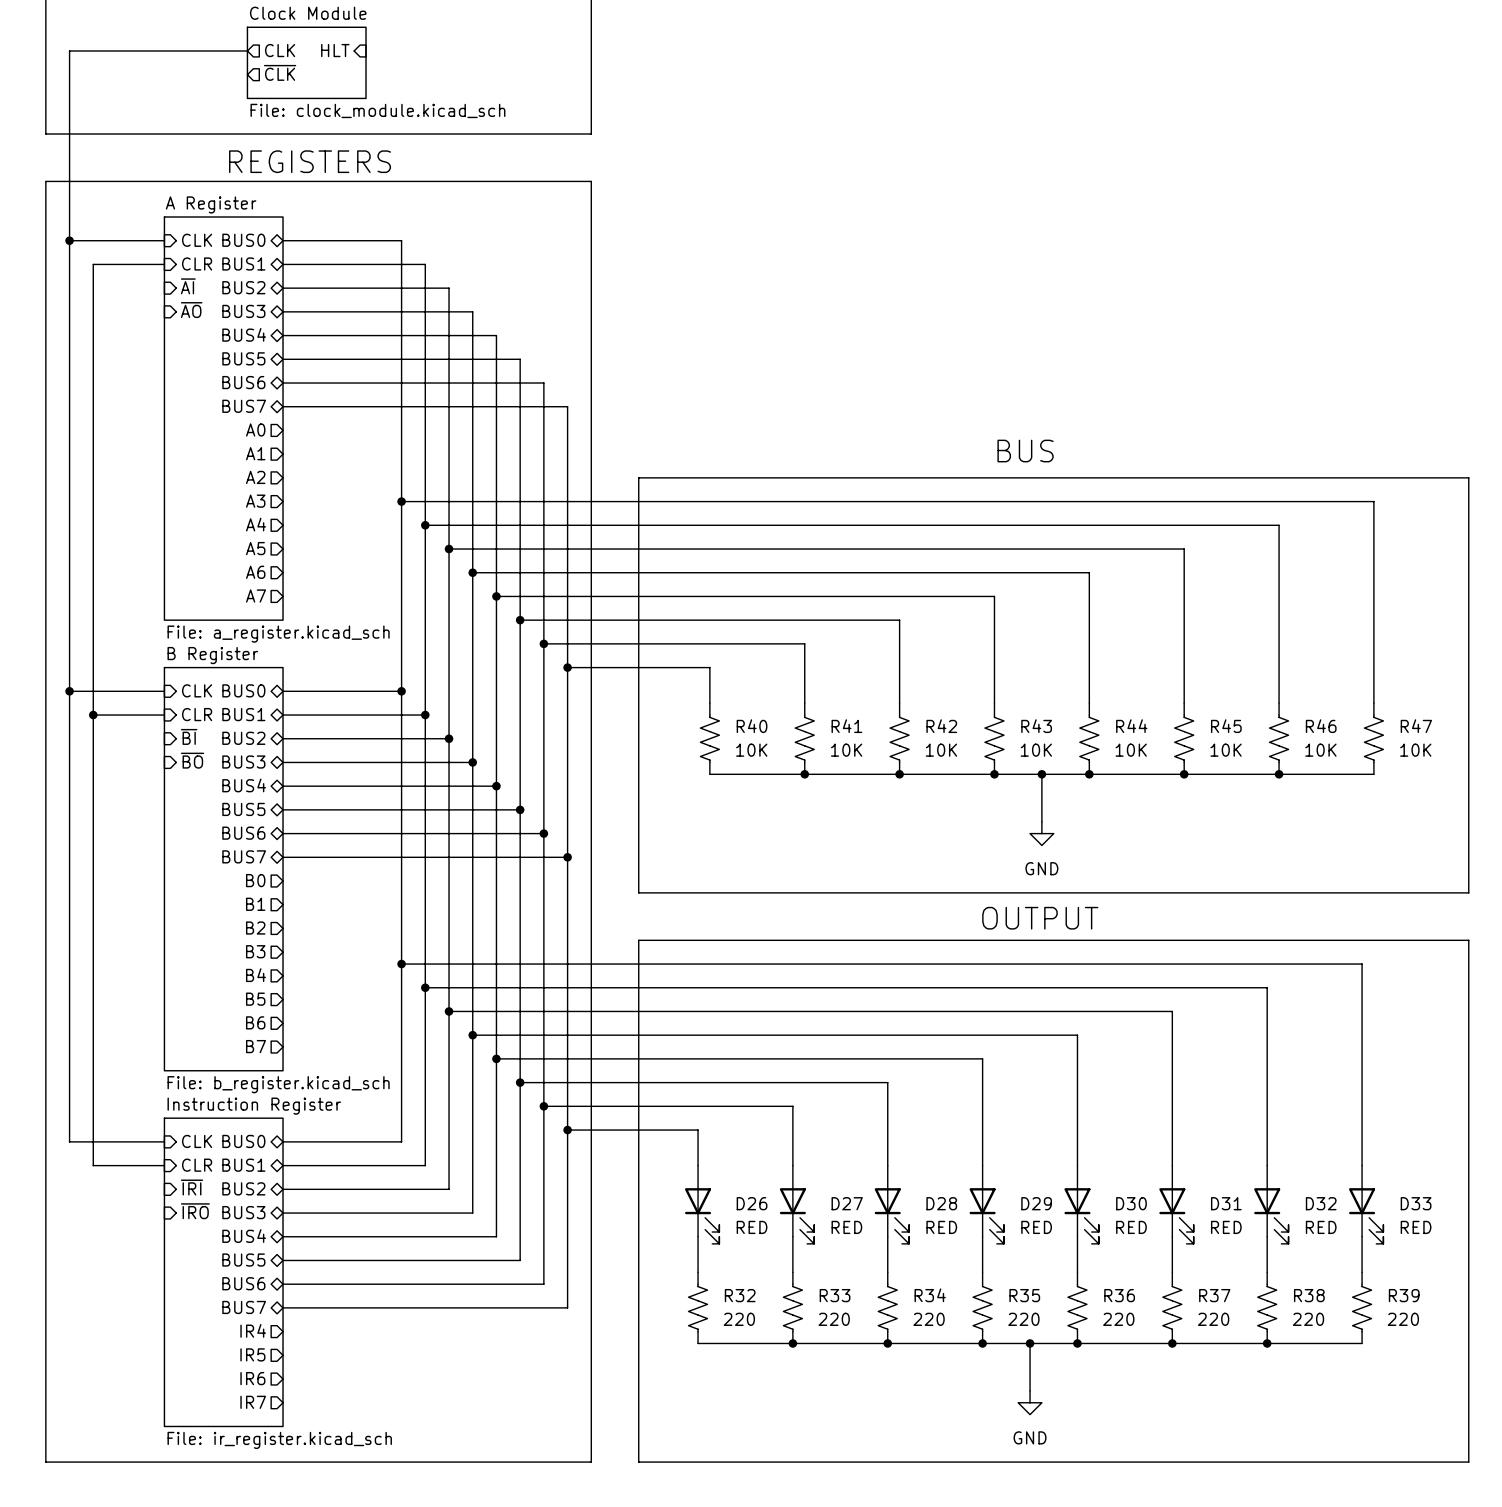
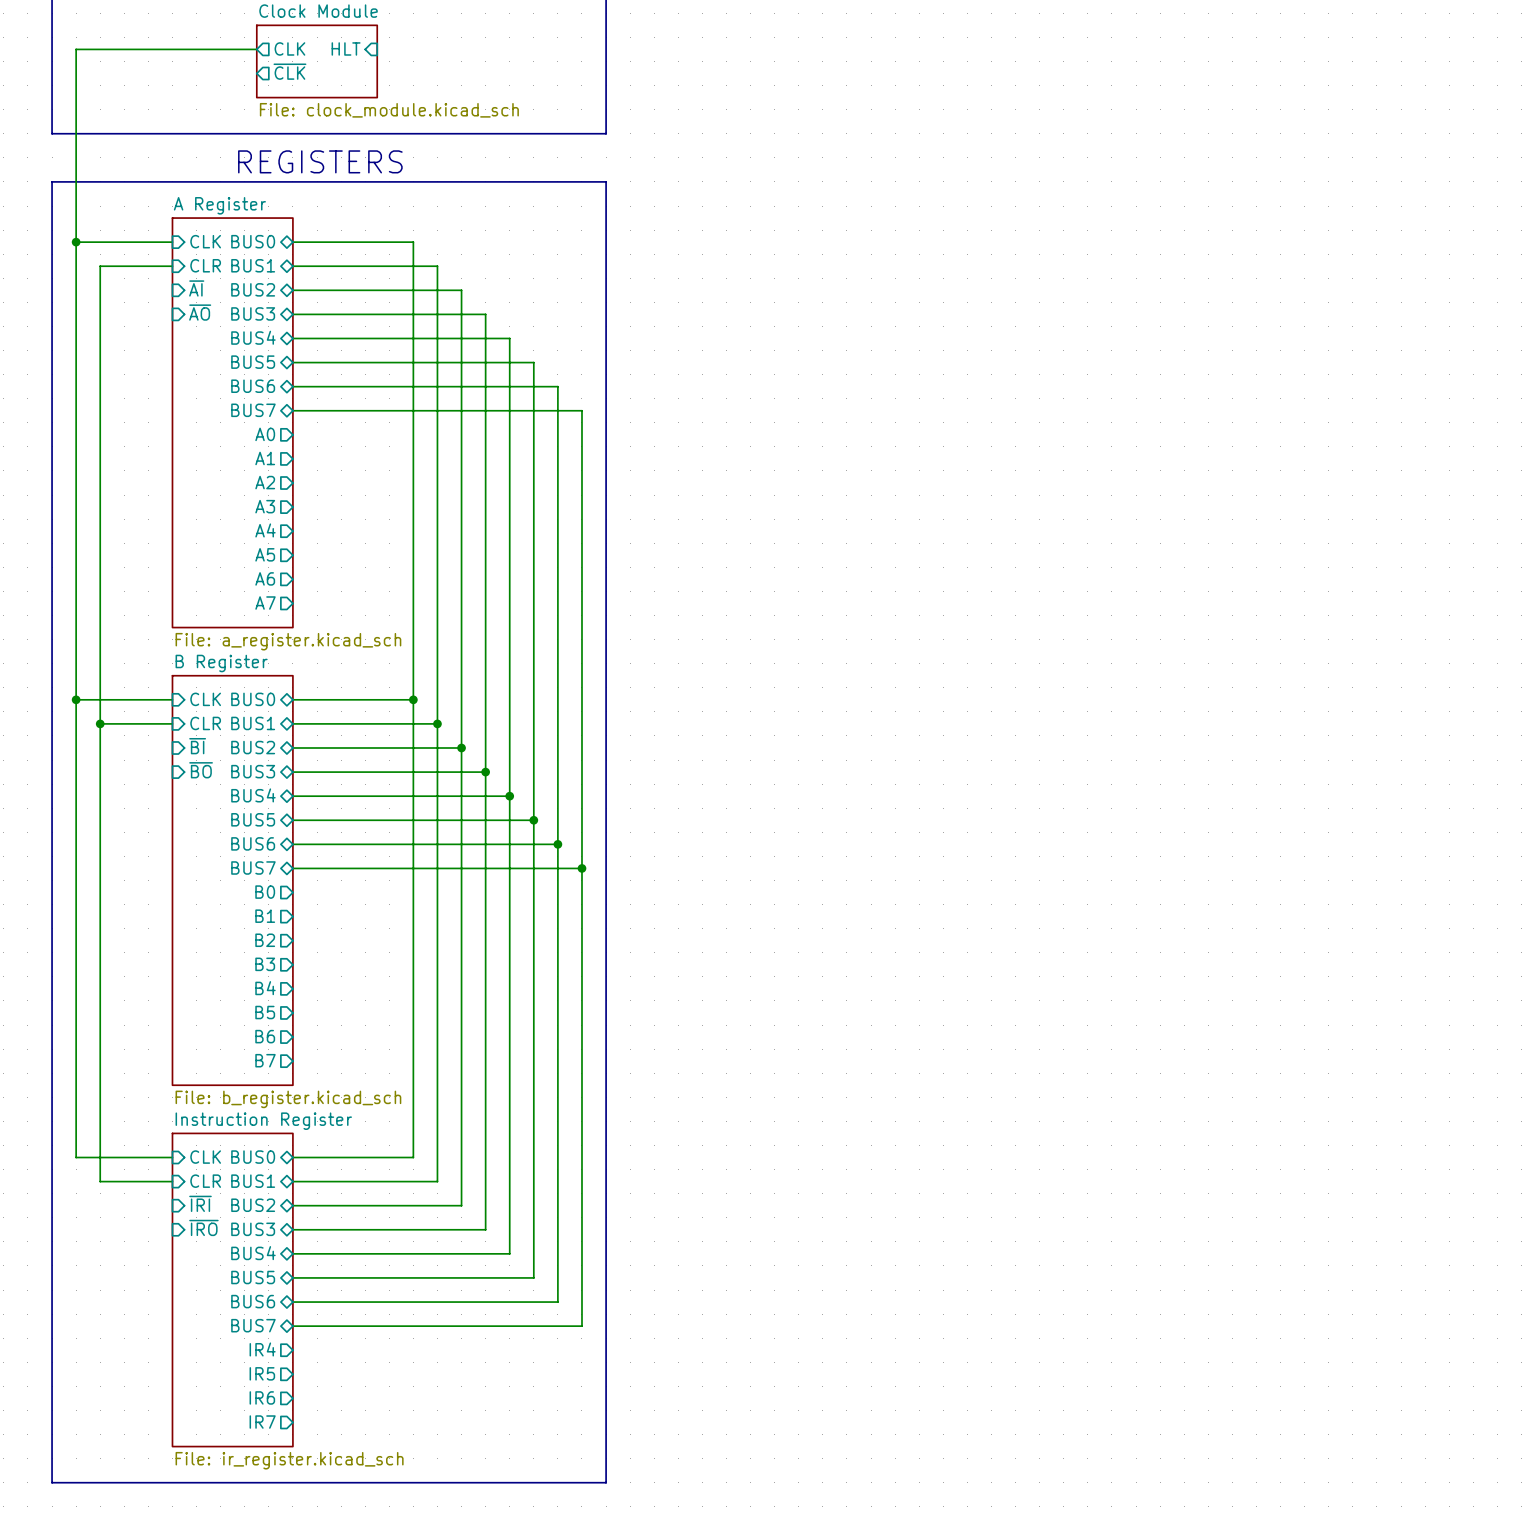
text: BUS (1025, 451) -> none
line: (638, 477) (638, 892) (1468, 892) (1468, 477) (638, 477) -> none
wire: (401, 501) (1373, 501) (1373, 703) -> none
junction: (401, 501) -> none
wire: (425, 525) (1279, 525) (1279, 703) -> none
junction: (425, 525) -> none
wire: (449, 549) (1184, 549) (1184, 703) -> none
junction: (449, 549) -> none
wire: (472, 572) (1089, 572) (1089, 703) -> none
junction: (472, 572) -> none
wire: (496, 596) (994, 596) (994, 703) -> none
junction: (496, 596) -> none
wire: (520, 620) (899, 620) (899, 703) -> none
junction: (520, 620) -> none
wire: (543, 643) (804, 643) (804, 703) -> none
junction: (543, 643) -> none
wire: (567, 667) (709, 667) (709, 703) -> none
junction: (567, 667) -> none
R40: 10K (709, 738) -> none
R41: 10K (804, 738) -> none
R42: 10K (899, 738) -> none
R43: 10K (994, 738) -> none
R44: 10K (1089, 738) -> none
R45: 10K (1184, 738) -> none
R46: 10K (1279, 738) -> none
R47: 10K (1373, 738) -> none
wire: (709, 774) (1373, 774) -> none
junction: (804, 774) -> none
junction: (899, 774) -> none
junction: (994, 774) -> none
wire: (1041, 774) (1041, 821) -> none
junction: (1041, 774) -> none
junction: (1089, 774) -> none
junction: (1184, 774) -> none
junction: (1279, 774) -> none
power symbol: GND (1041, 833) -> none
text: OUTPUT (1040, 918) -> none
line: (638, 940) (1468, 940) (1468, 1462) (638, 1462) (638, 940) -> none
wire: (401, 964) (1362, 964) (1362, 1165) -> none
junction: (401, 964) -> none
wire: (425, 987) (1267, 987) (1267, 1165) -> none
junction: (425, 987) -> none
wire: (449, 1011) (1172, 1011) (1172, 1165) -> none
junction: (449, 1011) -> none
wire: (472, 1035) (1077, 1035) (1077, 1165) -> none
junction: (472, 1035) -> none
wire: (496, 1058) (982, 1058) (982, 1165) -> none
junction: (496, 1058) -> none
wire: (520, 1082) (887, 1082) (887, 1165) -> none
junction: (520, 1082) -> none
wire: (543, 1106) (792, 1106) (792, 1165) -> none
junction: (543, 1106) -> none
wire: (567, 1130) (698, 1130) (698, 1165) -> none
junction: (567, 1130) -> none
D26: RED (702, 1204) -> none
D27: RED (797, 1204) -> none
D28: RED (891, 1204) -> none
D29: RED (986, 1204) -> none
D30: RED (1081, 1204) -> none
D31: RED (1176, 1204) -> none
D32: RED (1271, 1204) -> none
D33: RED (1366, 1204) -> none
wire: (698, 1236) (698, 1272) -> none
wire: (792, 1236) (792, 1272) -> none
wire: (887, 1236) (887, 1272) -> none
wire: (982, 1236) (982, 1272) -> none
wire: (1077, 1236) (1077, 1272) -> none
wire: (1172, 1236) (1172, 1272) -> none
wire: (1267, 1236) (1267, 1272) -> none
wire: (1362, 1236) (1362, 1272) -> none
R32: 220 (698, 1307) -> none
R33: 220 (792, 1307) -> none
R34: 220 (887, 1307) -> none
R35: 220 (982, 1307) -> none
R36: 220 (1077, 1307) -> none
R37: 220 (1172, 1307) -> none
R38: 220 (1267, 1307) -> none
R39: 220 (1362, 1307) -> none
wire: (698, 1343) (1362, 1343) -> none
junction: (792, 1343) -> none
junction: (887, 1343) -> none
junction: (982, 1343) -> none
wire: (1030, 1343) (1030, 1390) -> none
junction: (1030, 1343) -> none
junction: (1077, 1343) -> none
junction: (1172, 1343) -> none
junction: (1267, 1343) -> none
power symbol: GND (1030, 1402) -> none

